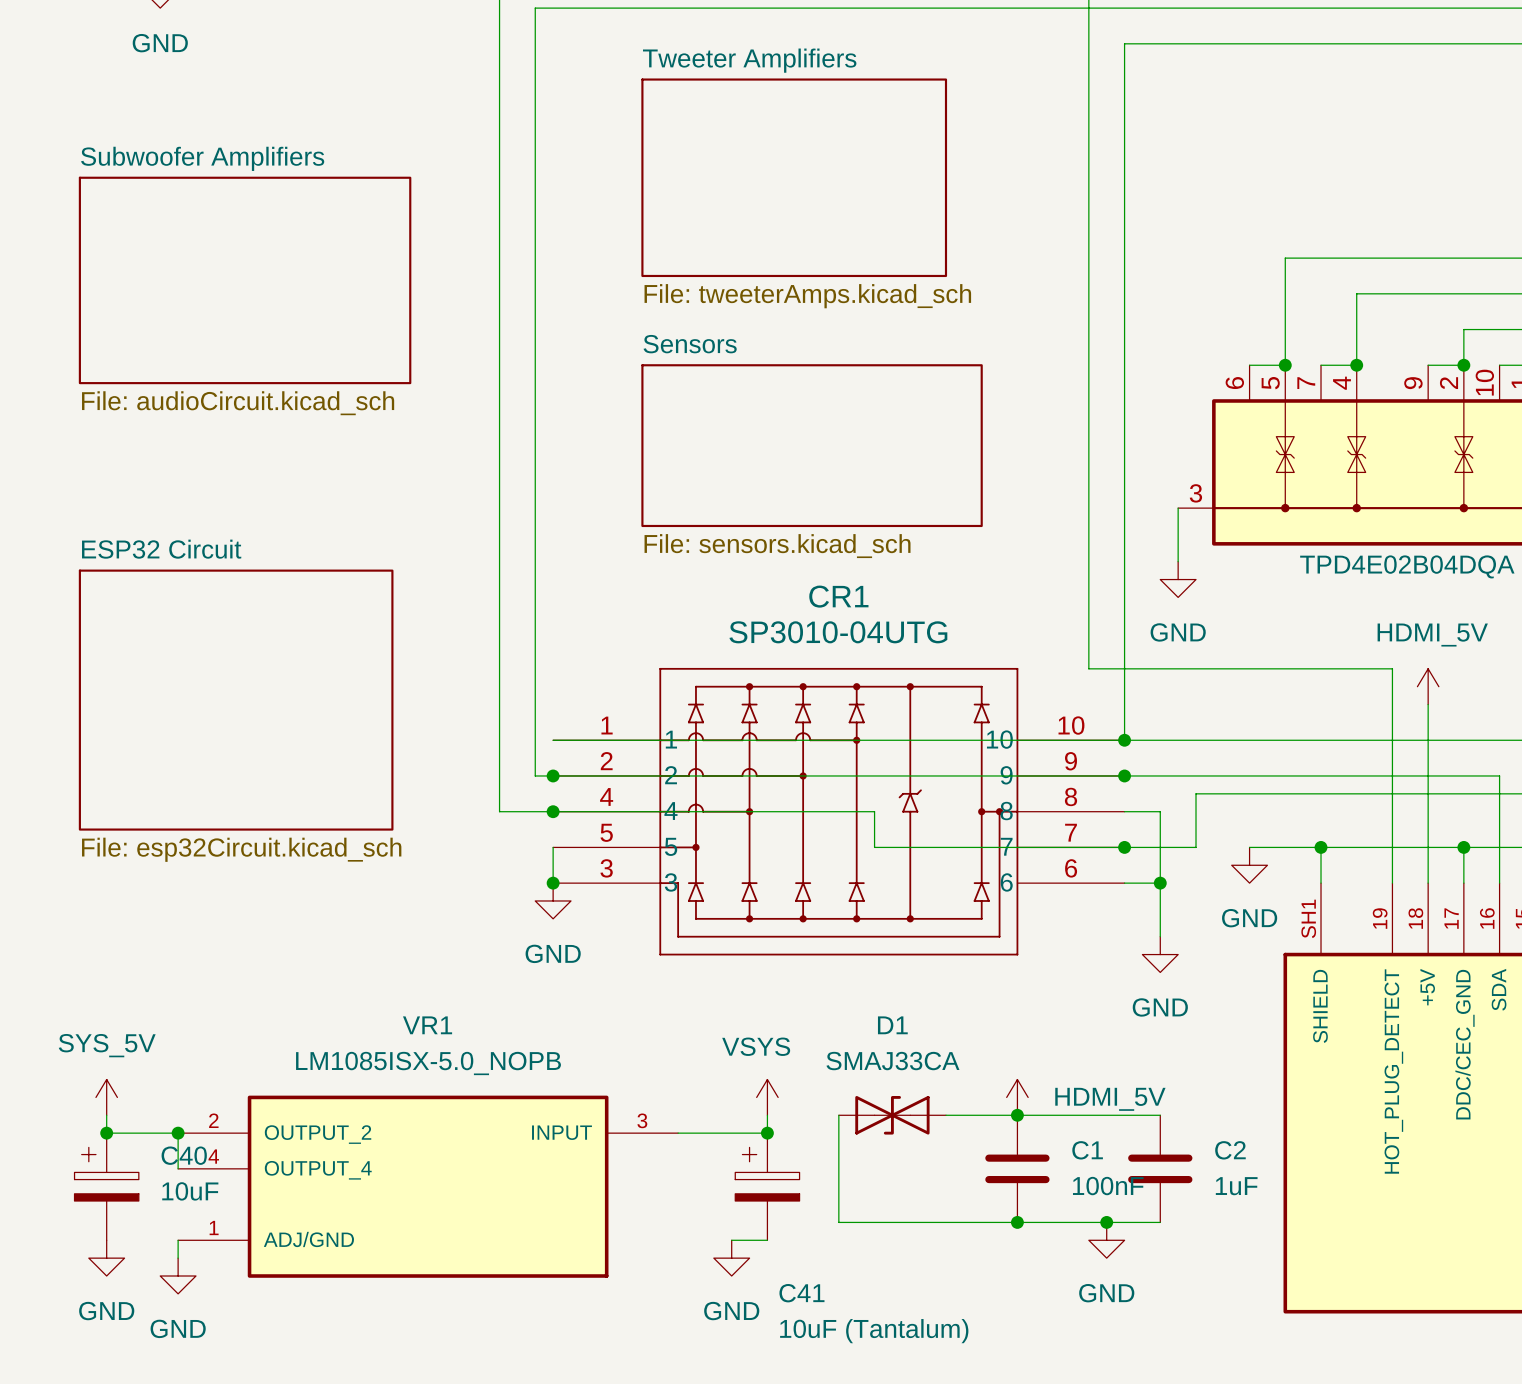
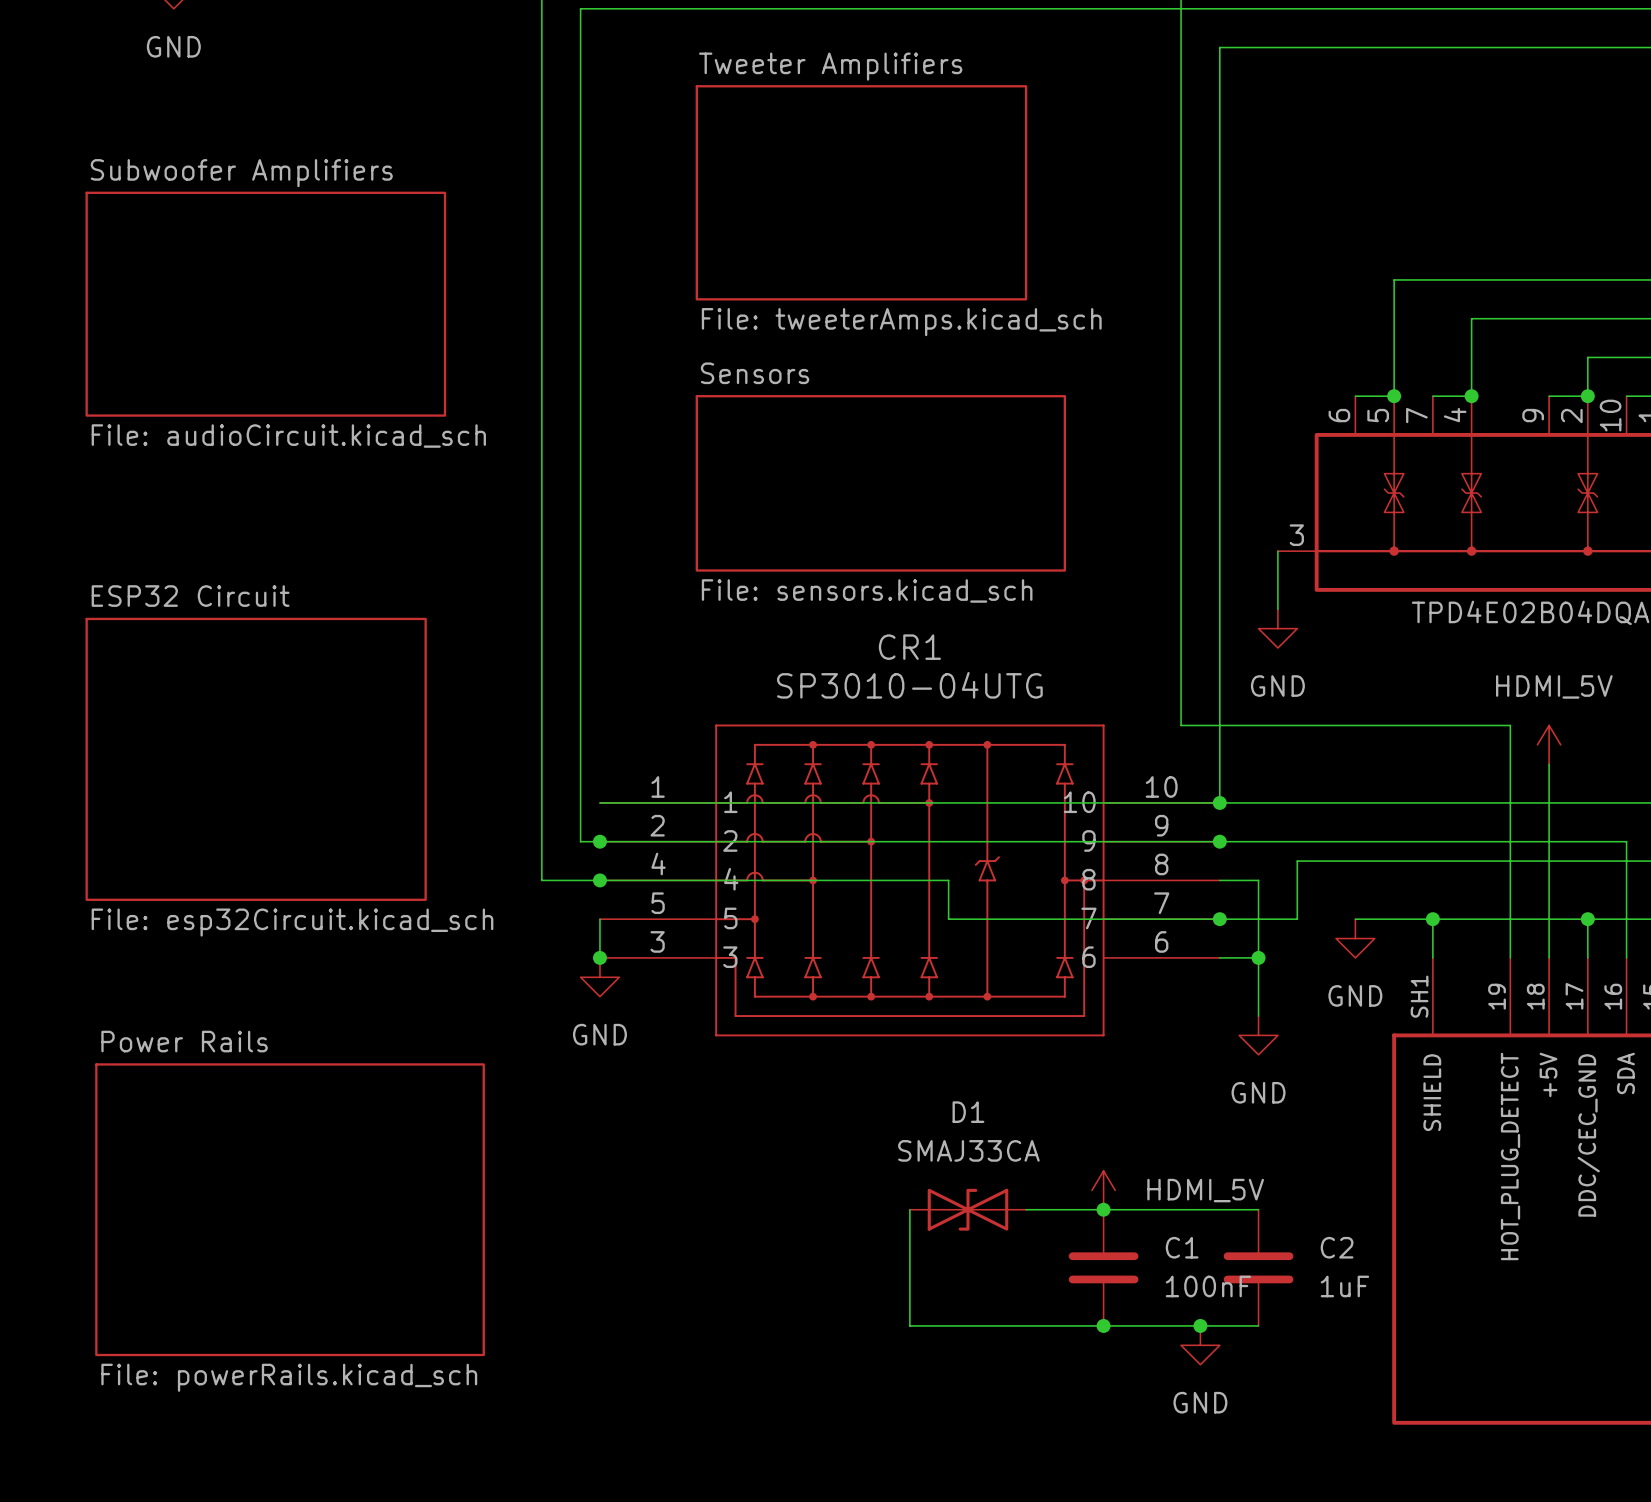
power symbol: SYS_5V (106, 1097) -> none
power symbol: VSYS (767, 1097) -> none
wire: (106, 1115) (106, 1133) (178, 1133) (178, 1168) -> none
sheet Power Rails: none -> File: powerRails.kicad_sch (290, 1209)
wire: (767, 1115) (767, 1133) (678, 1133) -> none
junction: (106, 1133) -> none
junction: (178, 1133) -> none
junction: (767, 1133) -> none
C40: 10uF (106, 1186) -> none
VR1: LM1085ISX-5.0_NOPB (428, 1186) -> none
C41: 10uF (Tantalum) (767, 1186) -> none
wire: (178, 1240) (178, 1258) -> none
wire: (731, 1240) (767, 1240) -> none
power symbol: GND (106, 1258) -> none
power symbol: GND (731, 1258) -> none
power symbol: GND (178, 1276) -> none

